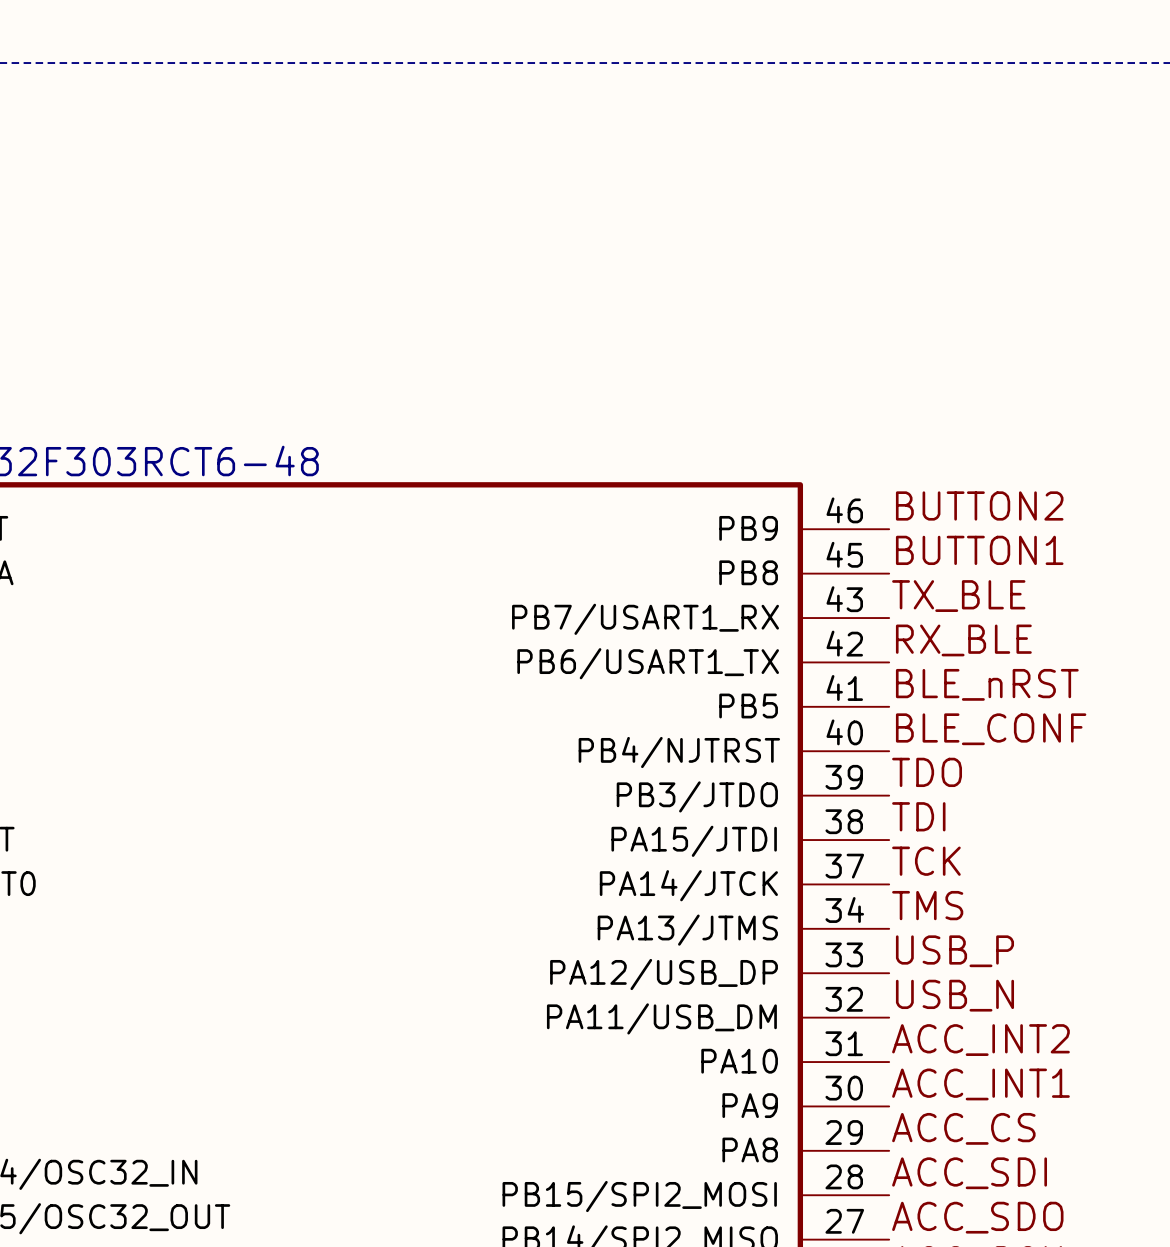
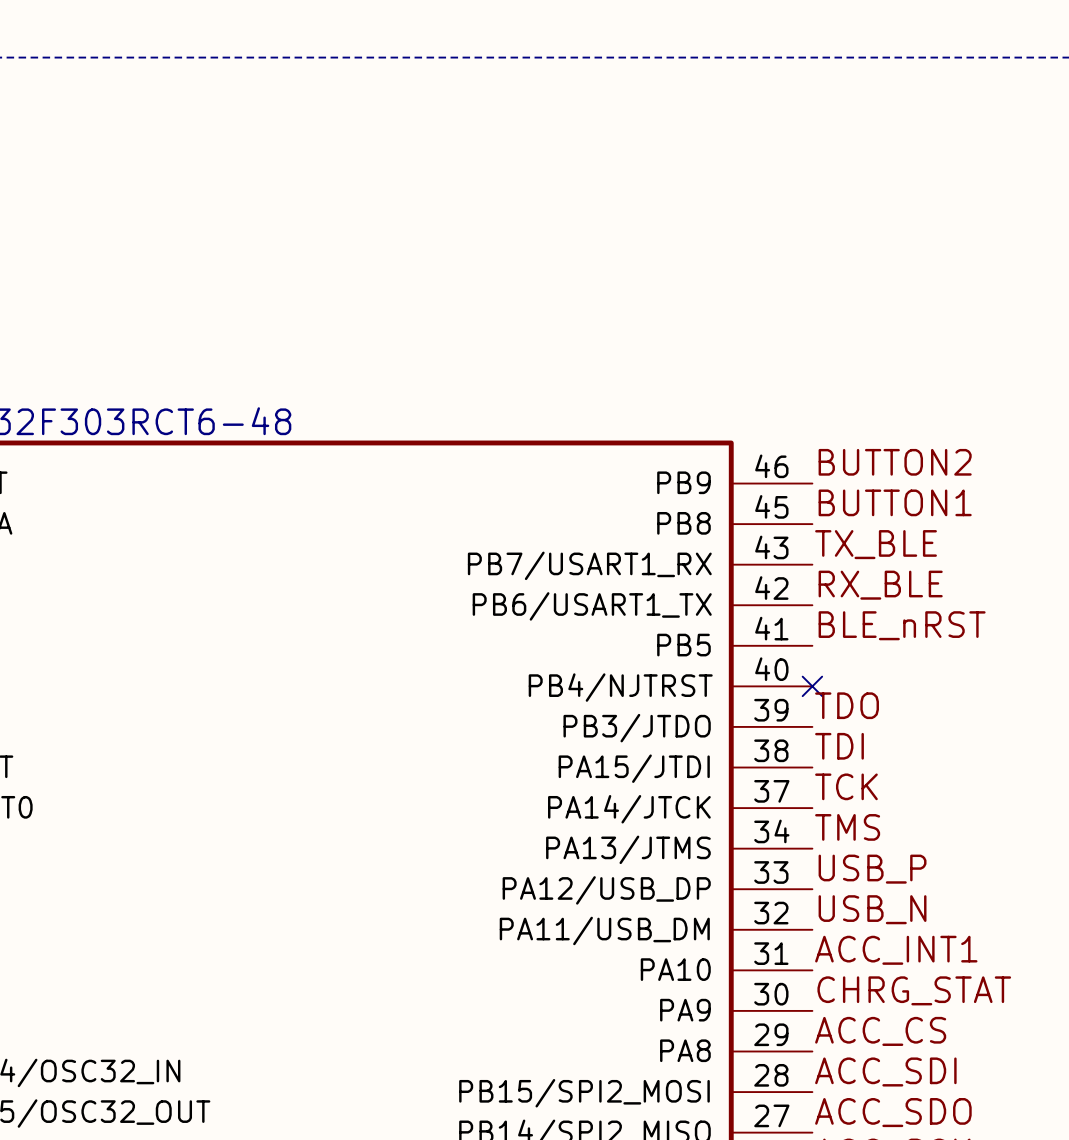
label: BLE_CONF (991, 729) -> none
no-connect mark: none -> (812, 686)
label: ACC_INT2 (980, 1040) -> ACC_INT1 (896, 950)
label: ACC_INT1 (980, 1084) -> CHRG_STAT (914, 990)

